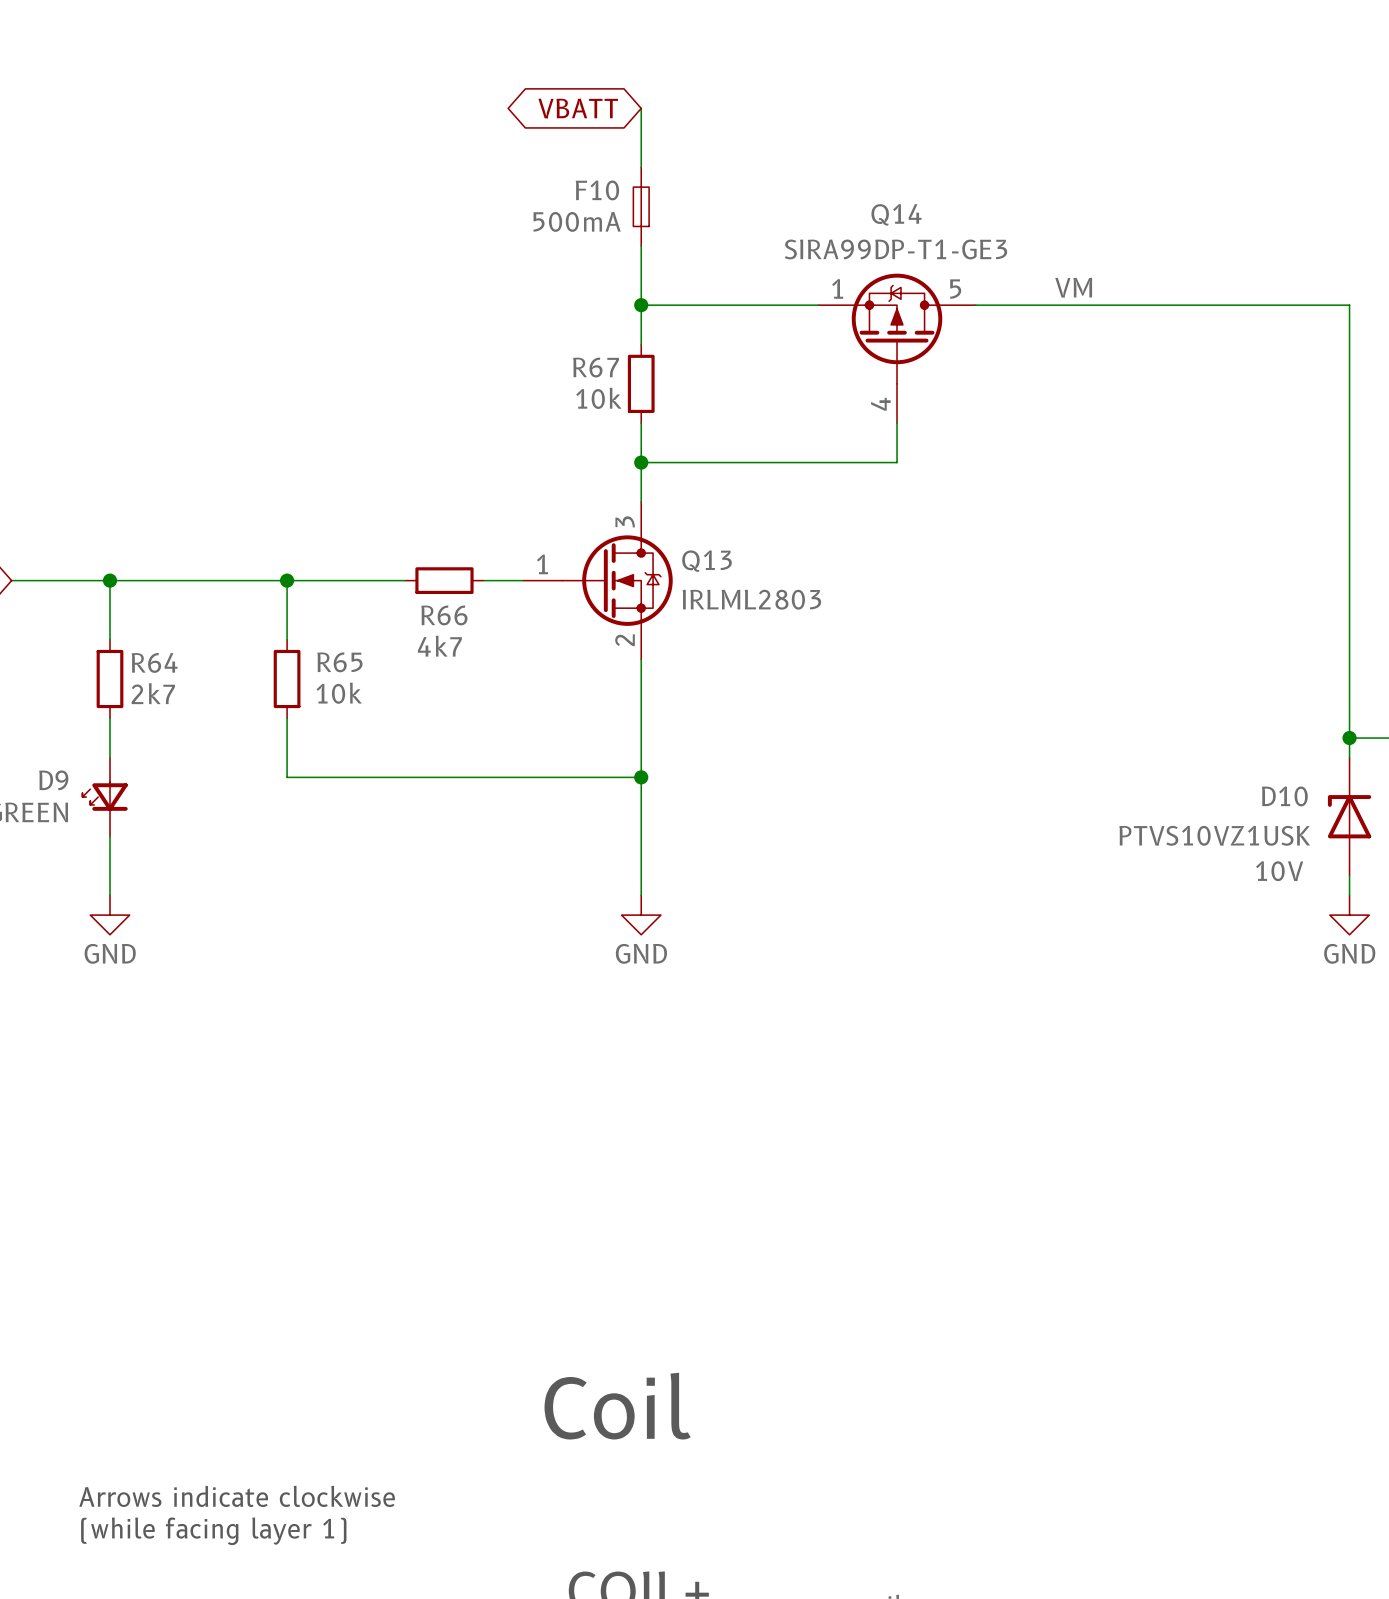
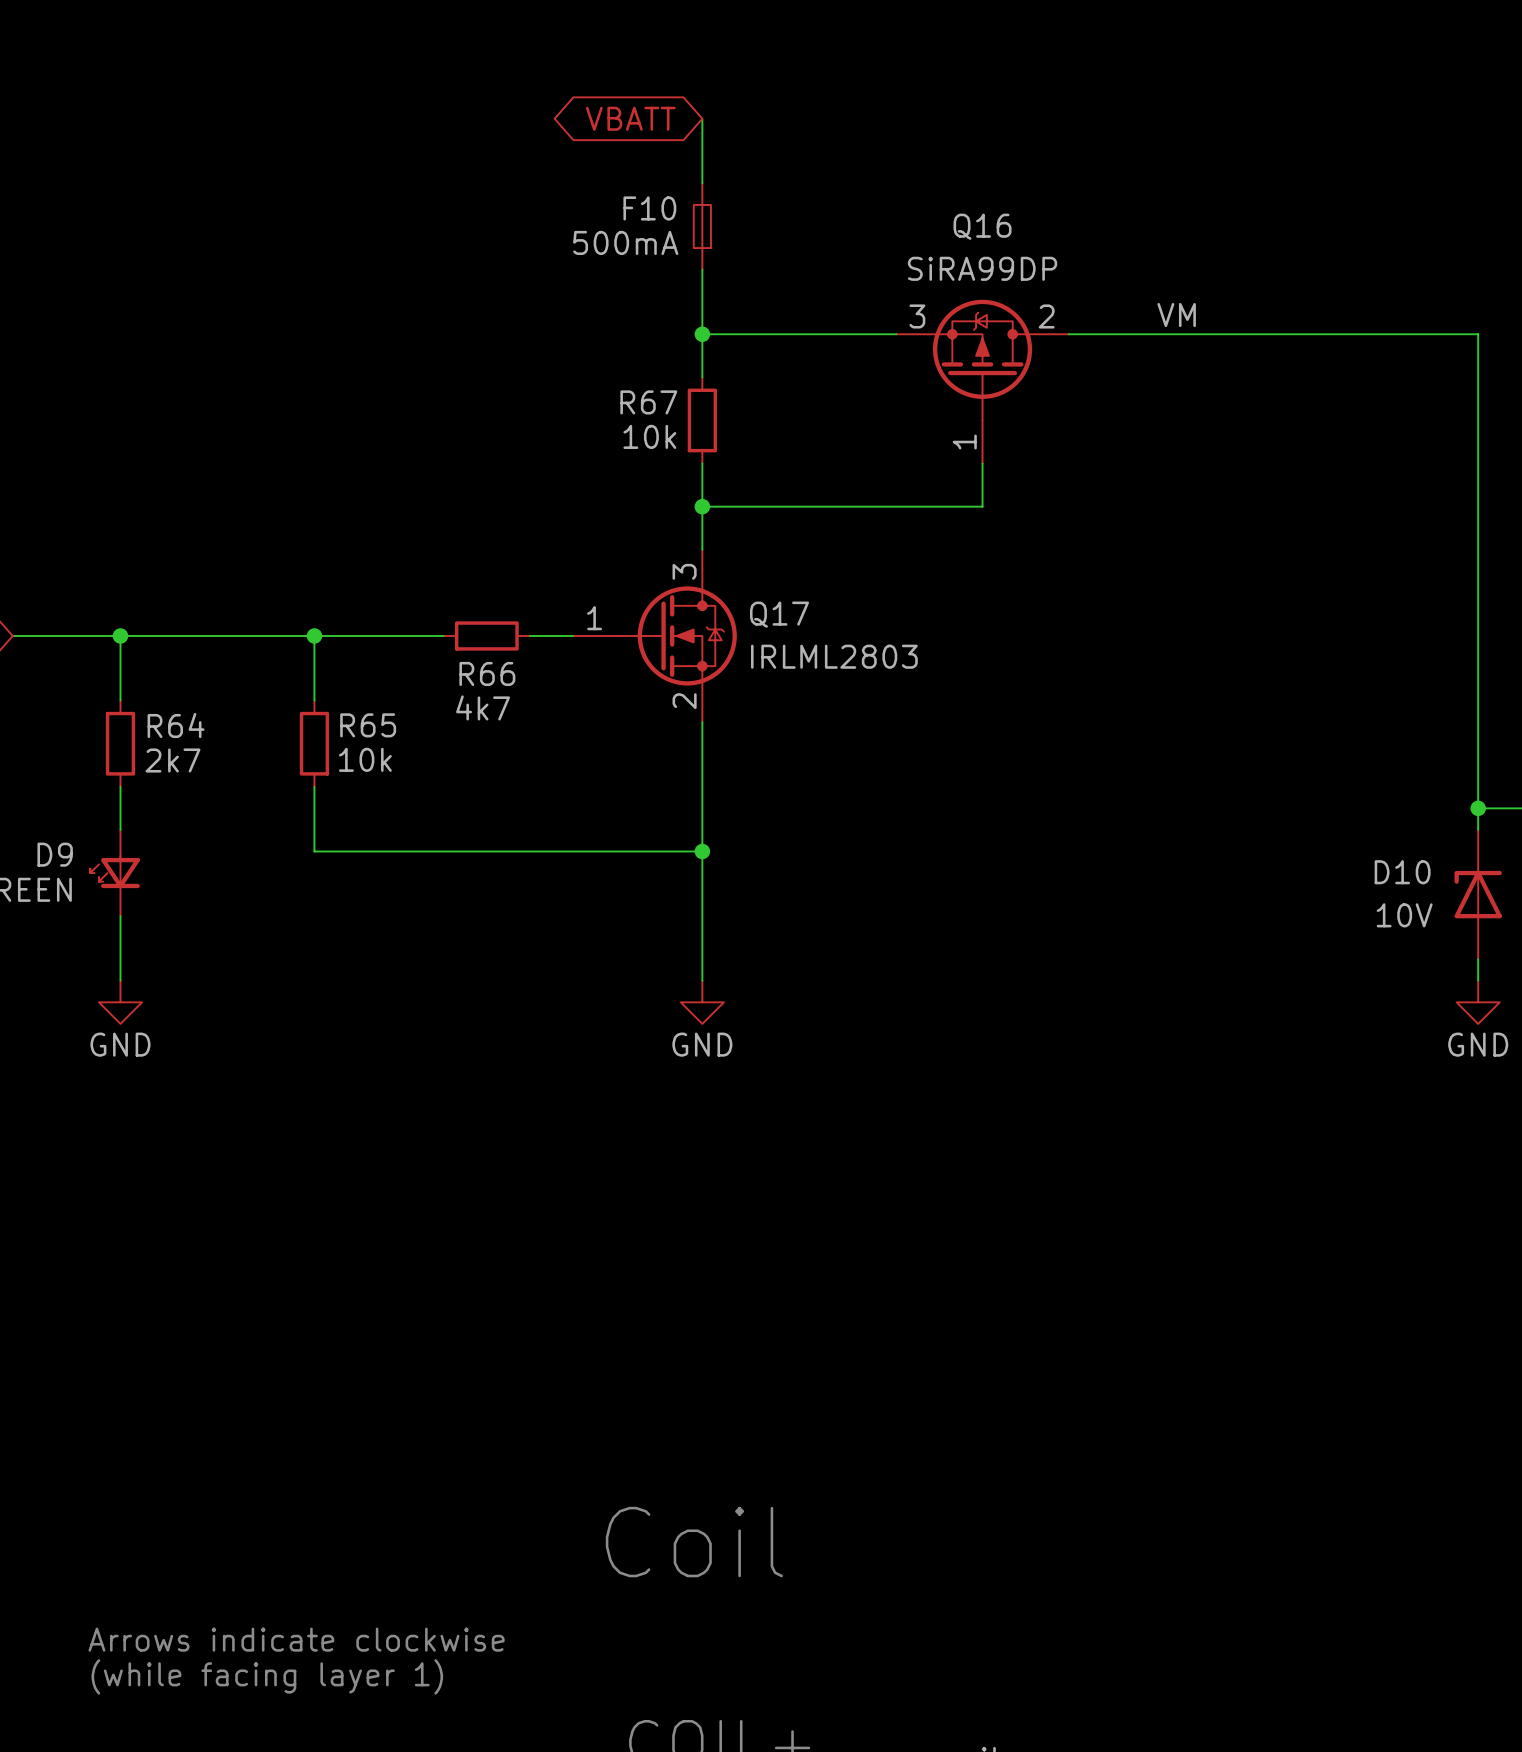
Q14 name: Q14 (896, 214) -> Q16 (982, 226)
Q14 value: SIRA99DP-T1-GE3 (895, 249) -> SiRA99DP (982, 268)
Q14 pin number: 1 (837, 288) -> 3 (917, 316)
Q14 pin number: 5 (955, 289) -> 2 (1046, 316)
Q14 pin number: 4 (880, 404) -> 1 (964, 442)
Q13 name: Q13 (707, 561) -> Q17 (779, 614)
D10 value: PTVS10VZ1USK (1214, 835) -> 10V (1404, 915)
D10 text: 10V (1279, 871) -> none

